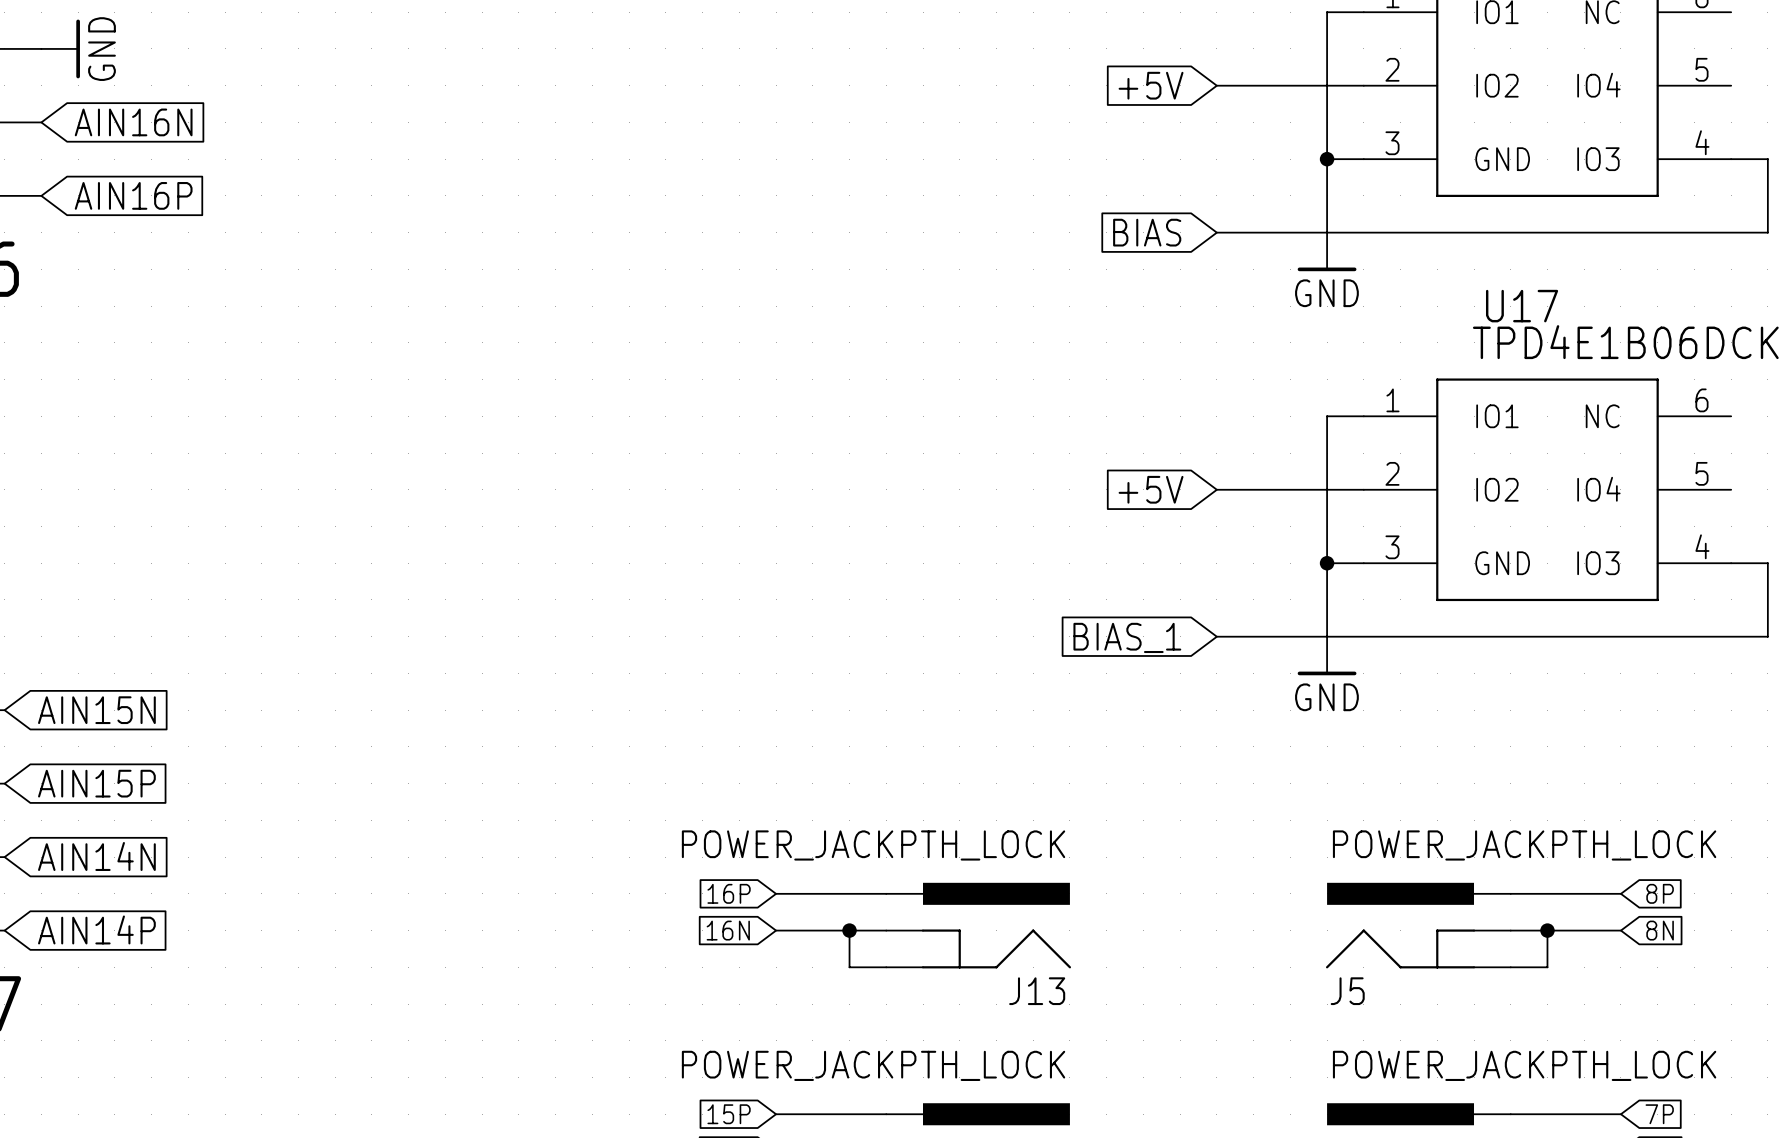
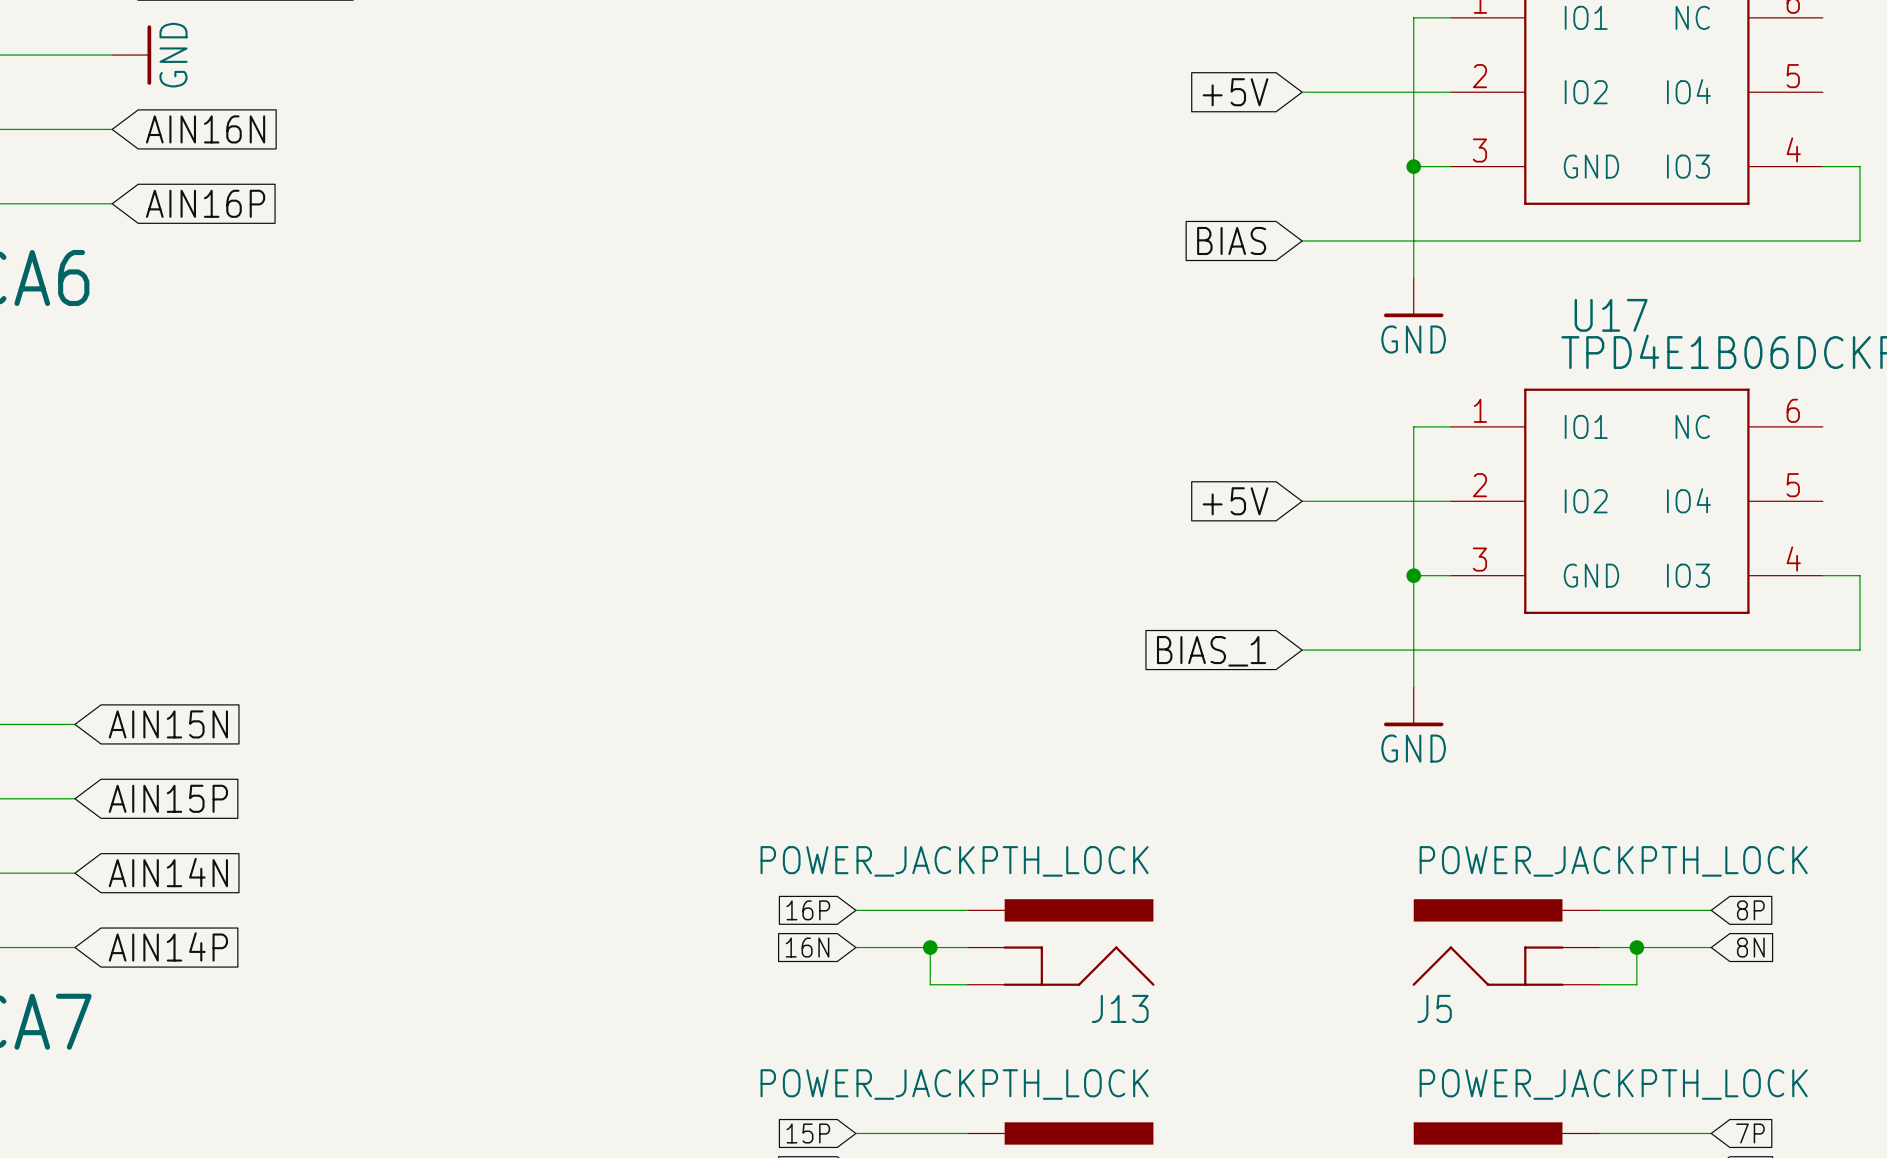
power symbol position: GND (1327, 251) -> GND (1413, 297)
power symbol position: GND (1327, 655) -> GND (1413, 706)

